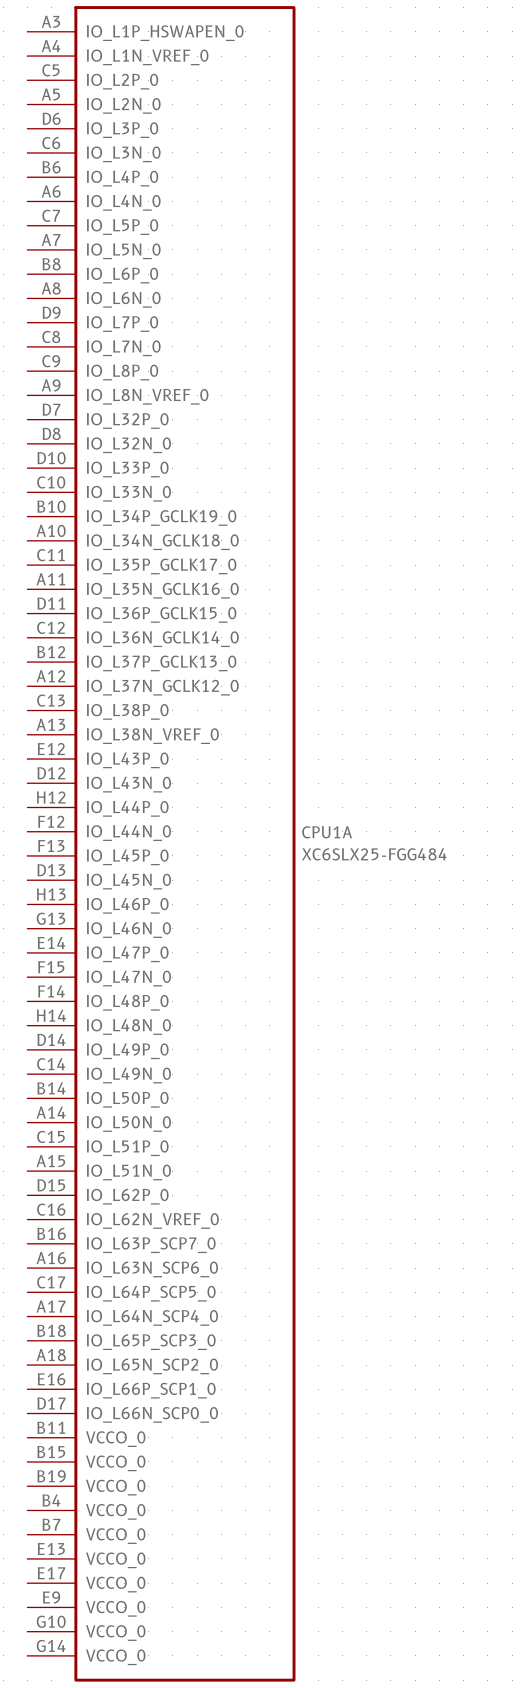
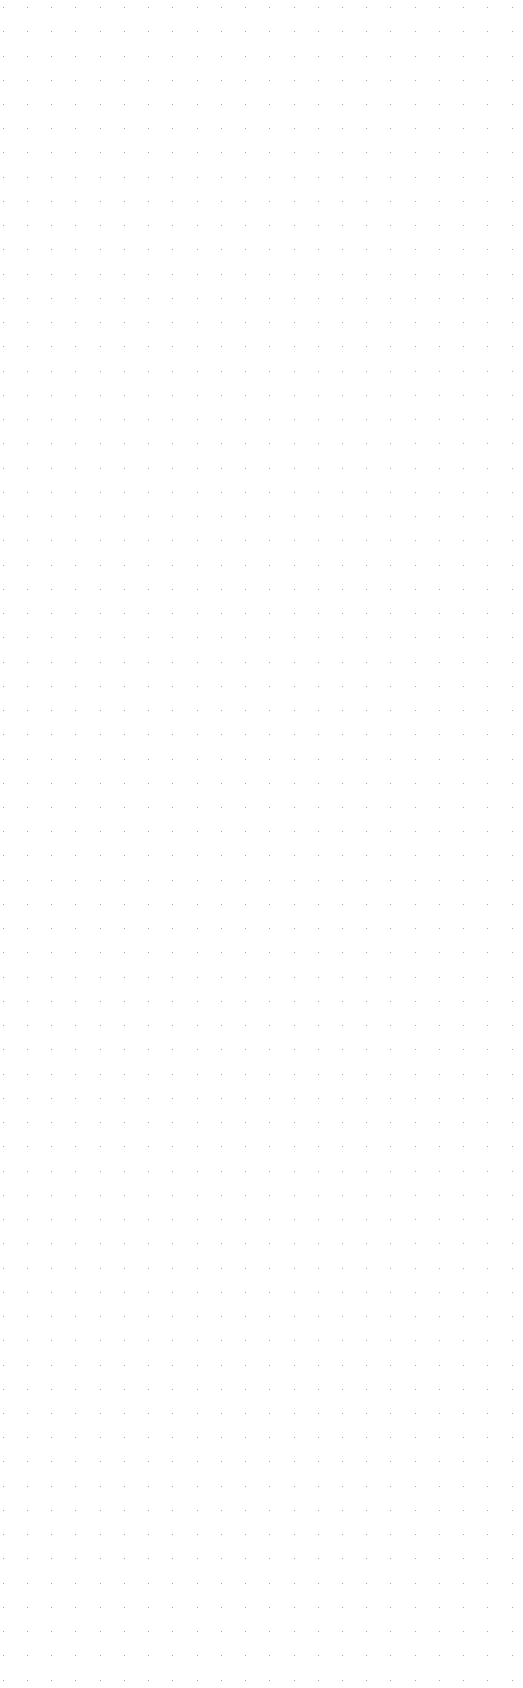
CPU1A: XC6SLX25-FGG484 (161, 843) -> none

